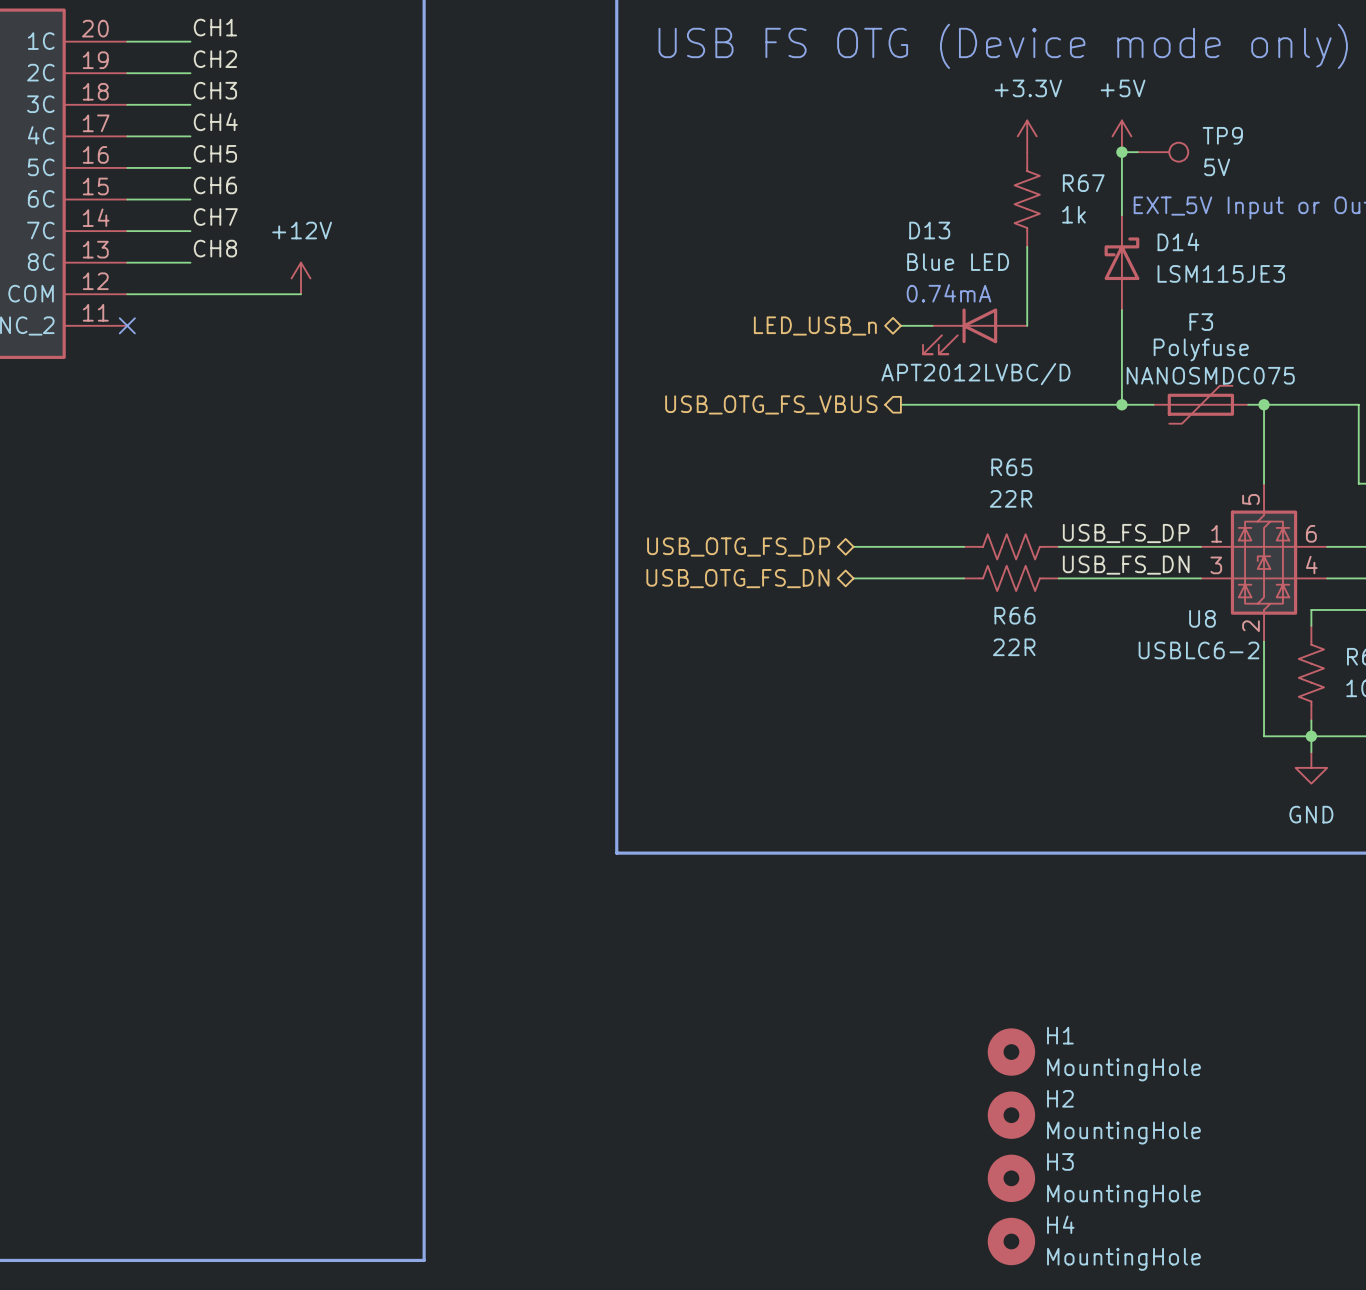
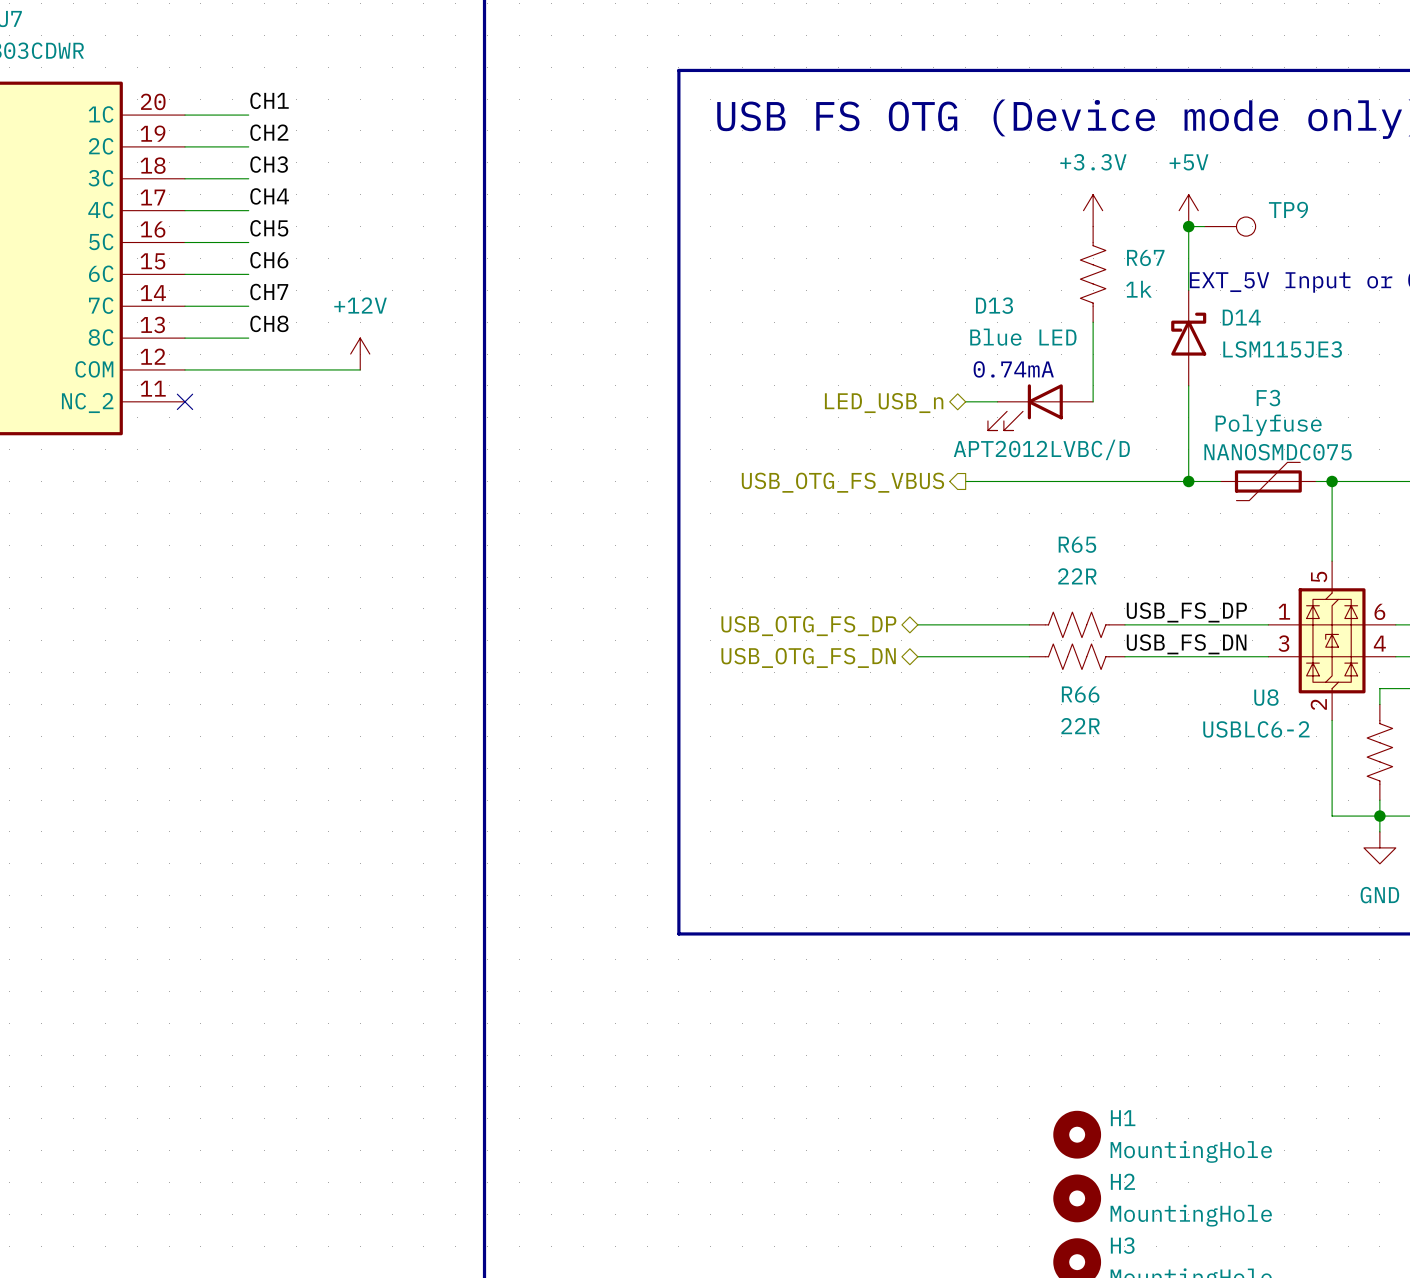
TP9 value: 5V (1217, 167) -> none

